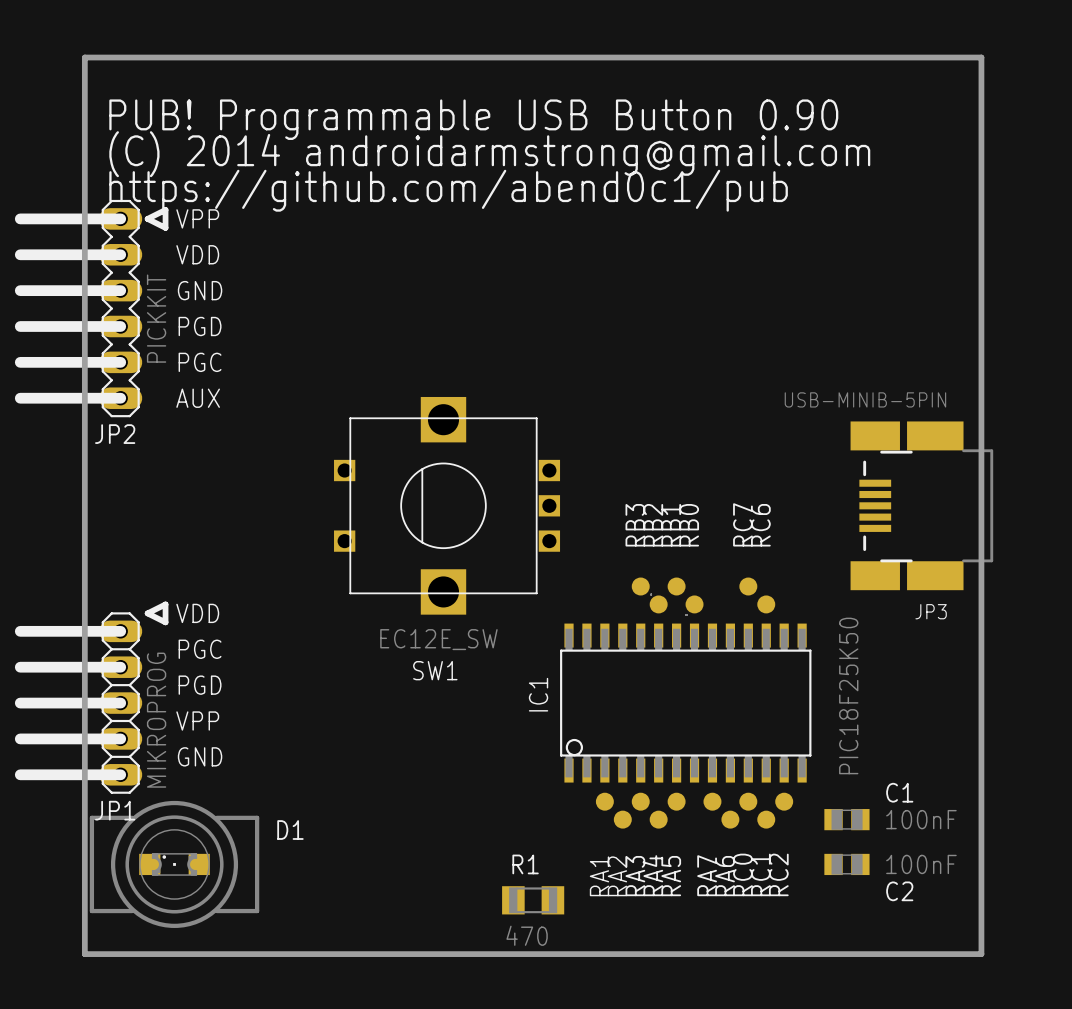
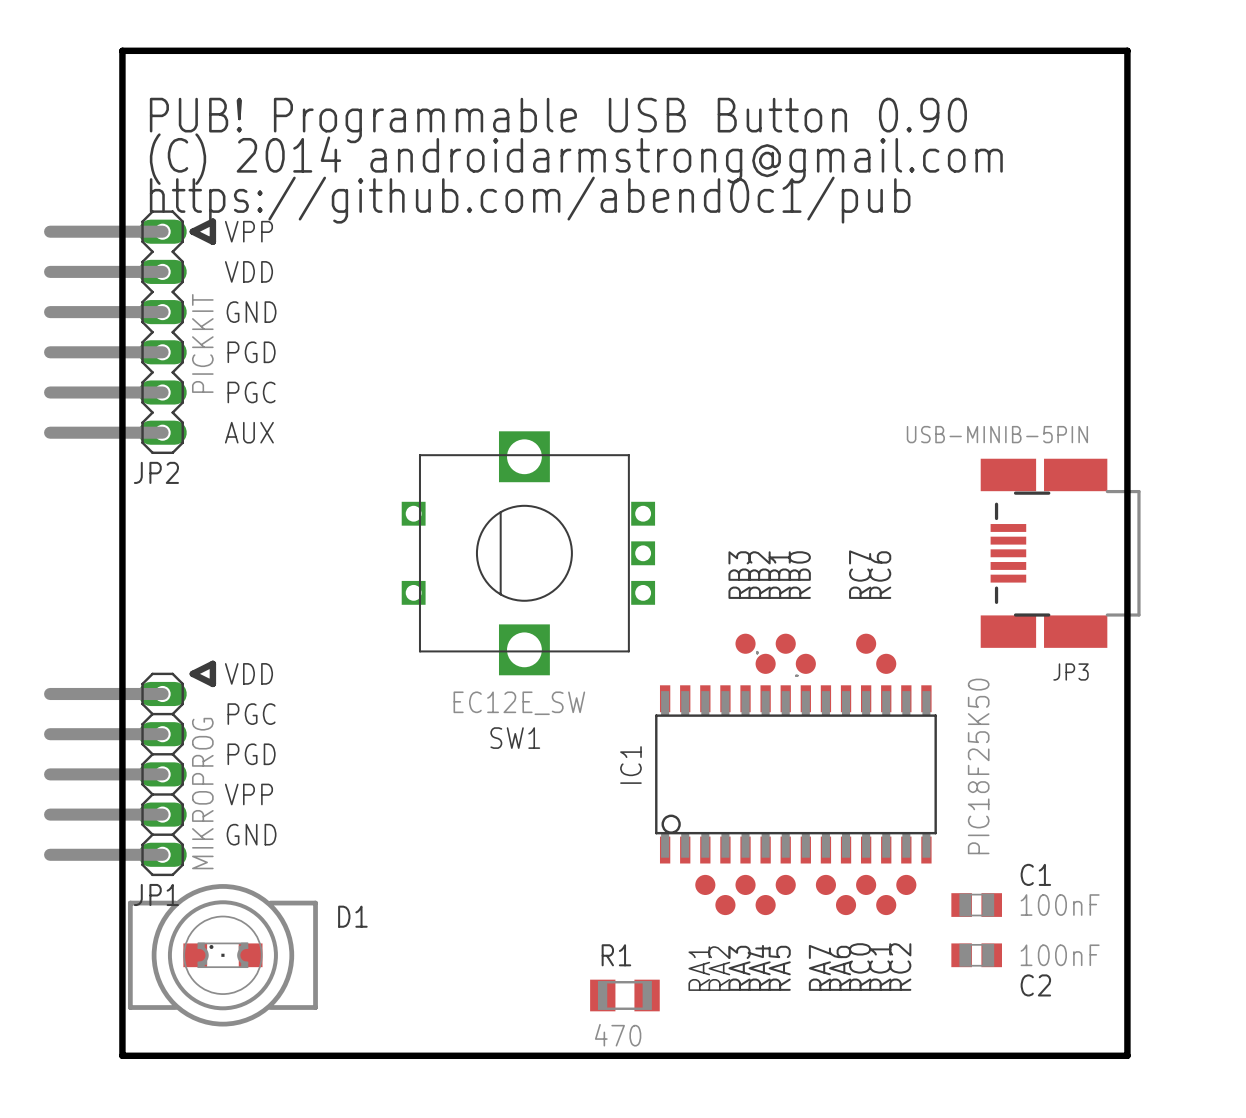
JP2 footprint: [14, 199, 143, 418] -> [44, 210, 187, 455]
JP1 footprint: [14, 612, 143, 794] -> [44, 672, 187, 877]

